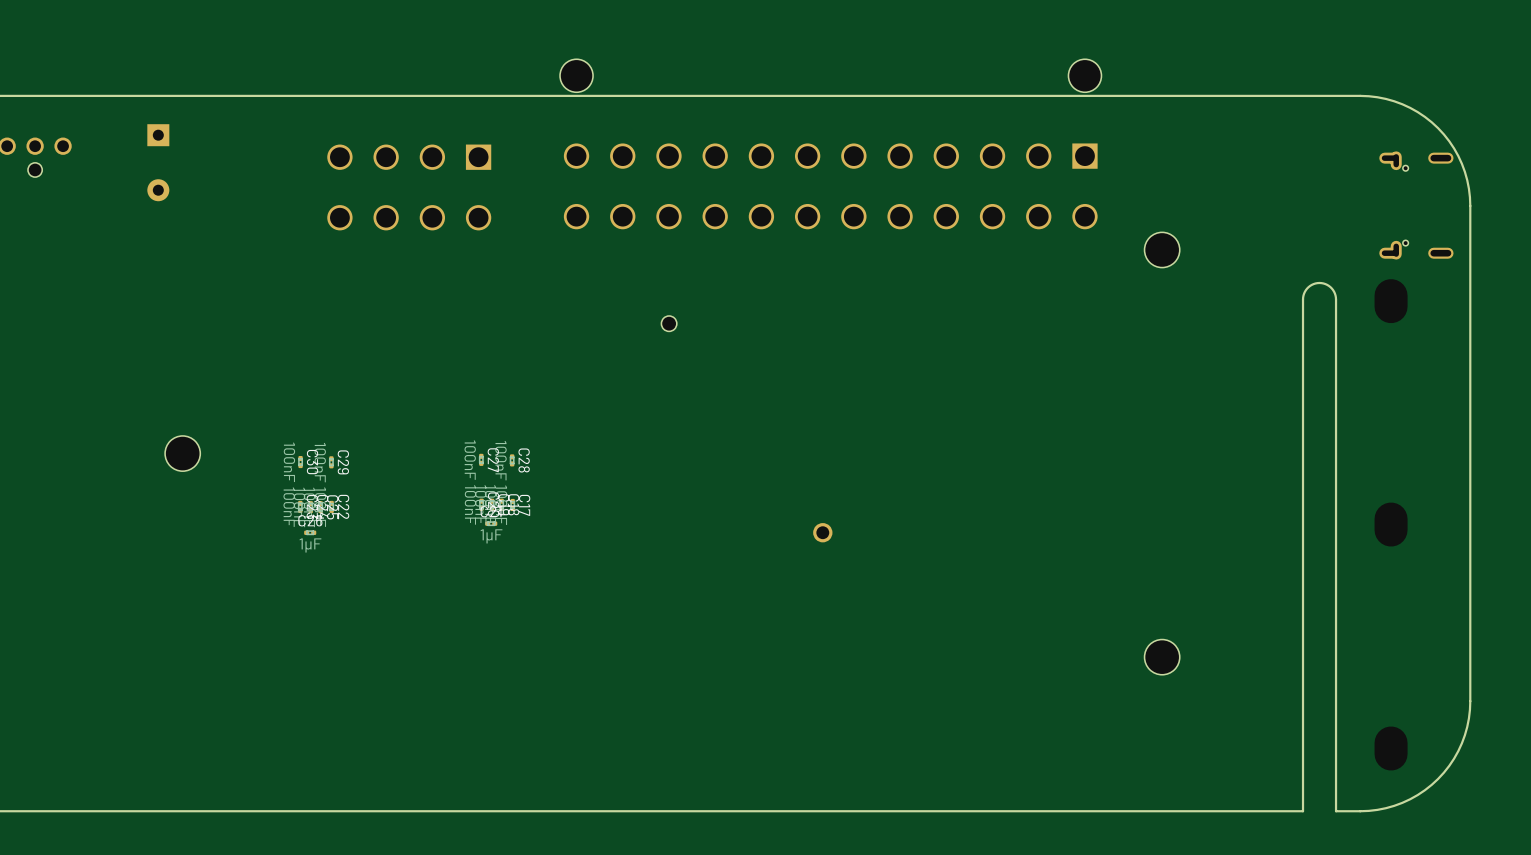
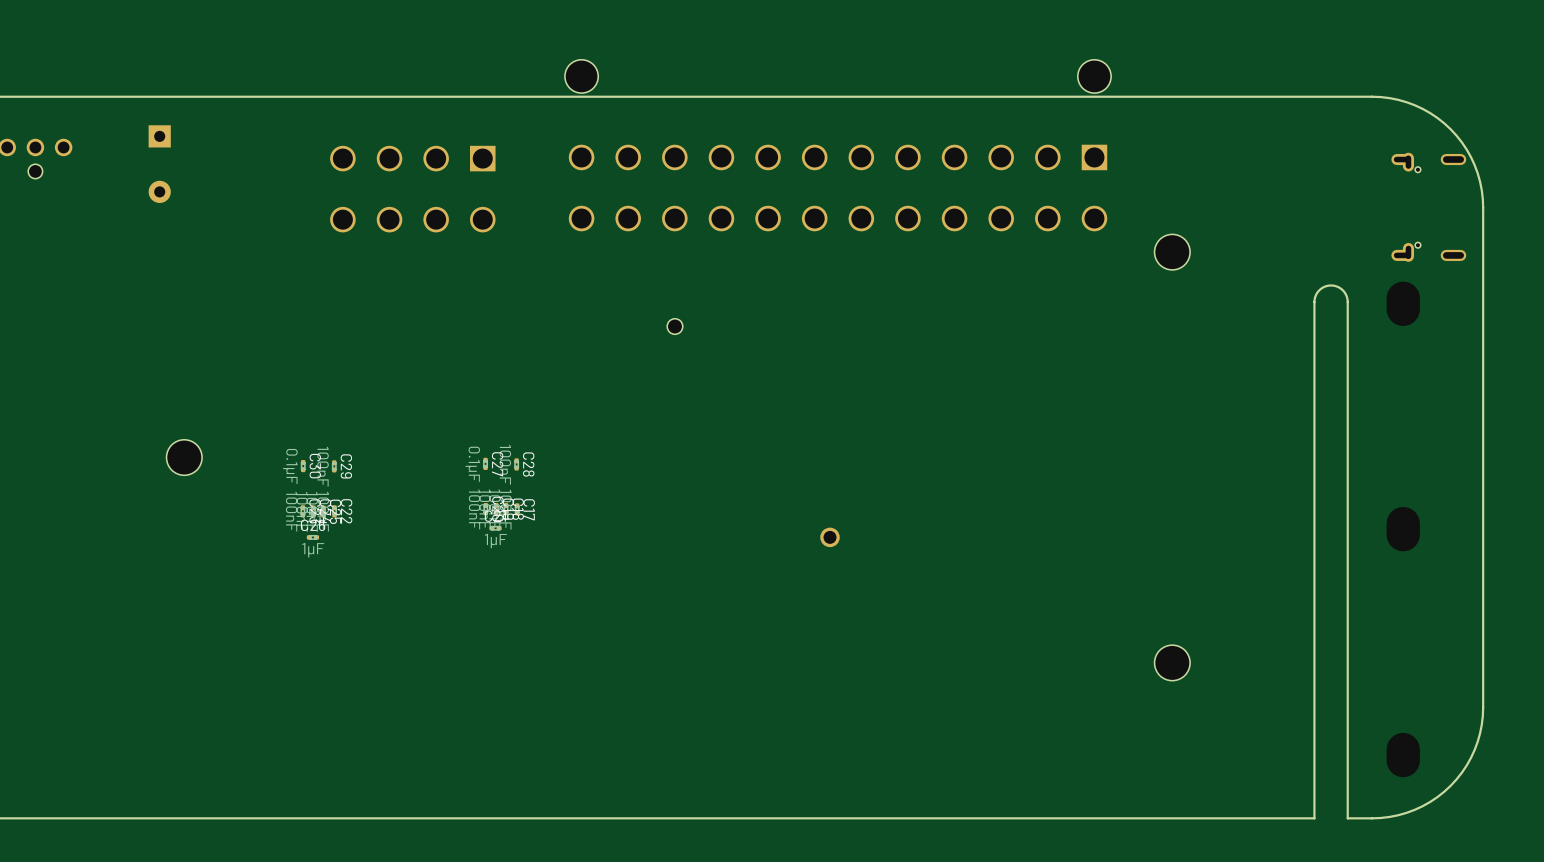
C27 value: 100nF (470, 460) -> 0.1μF (472, 464)
C30 value: 100nF (289, 462) -> 0.1μF (290, 466)

